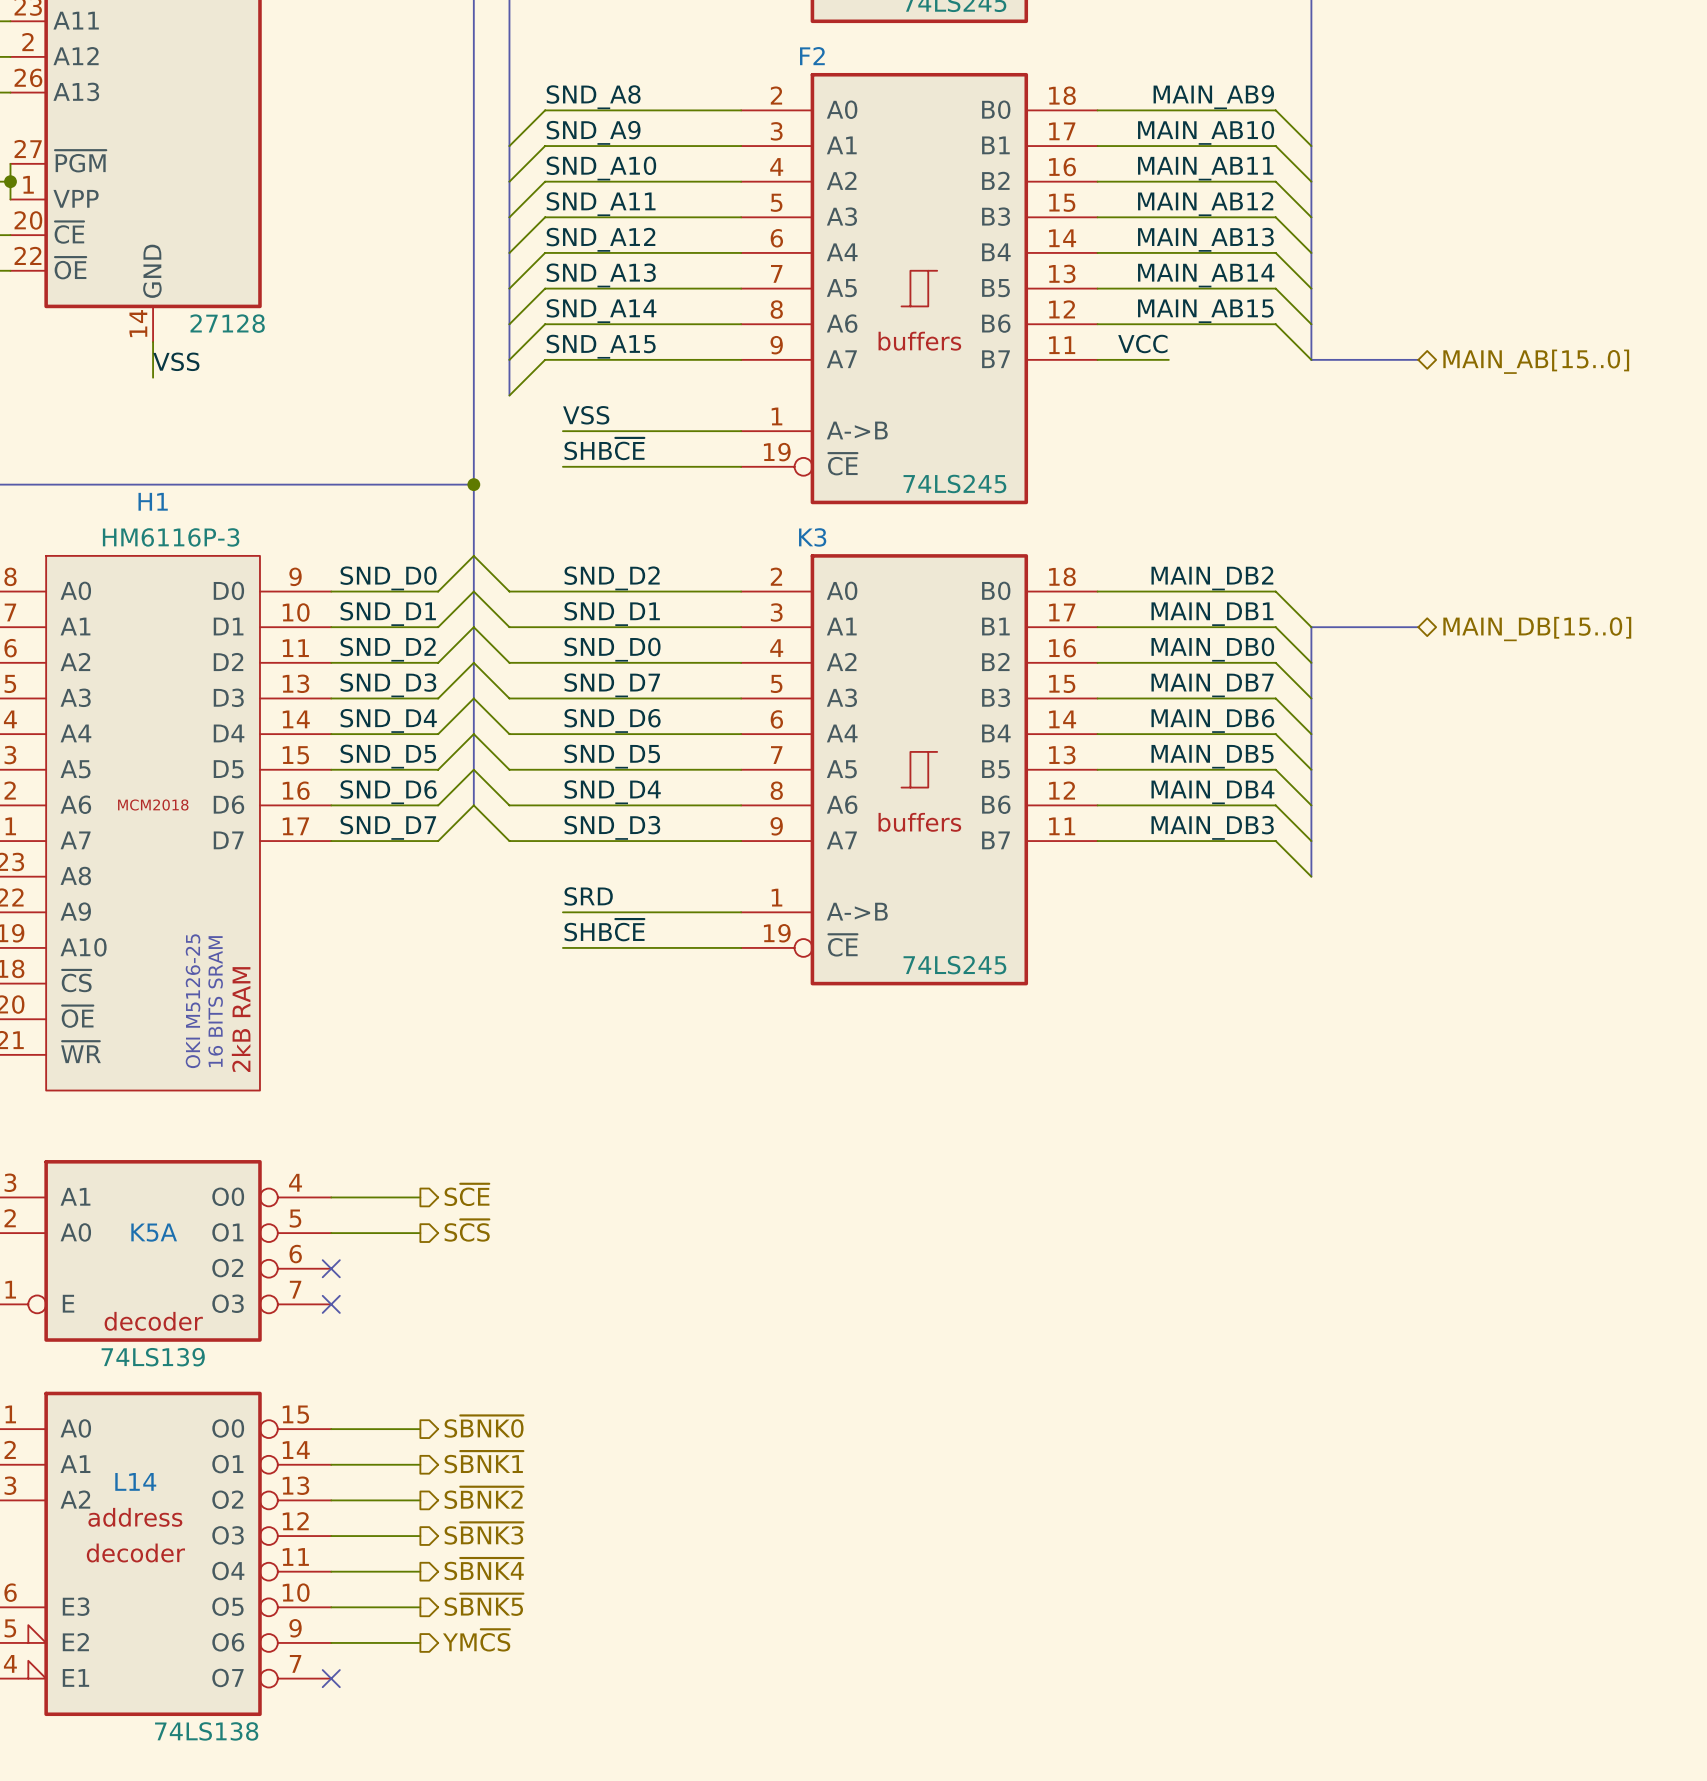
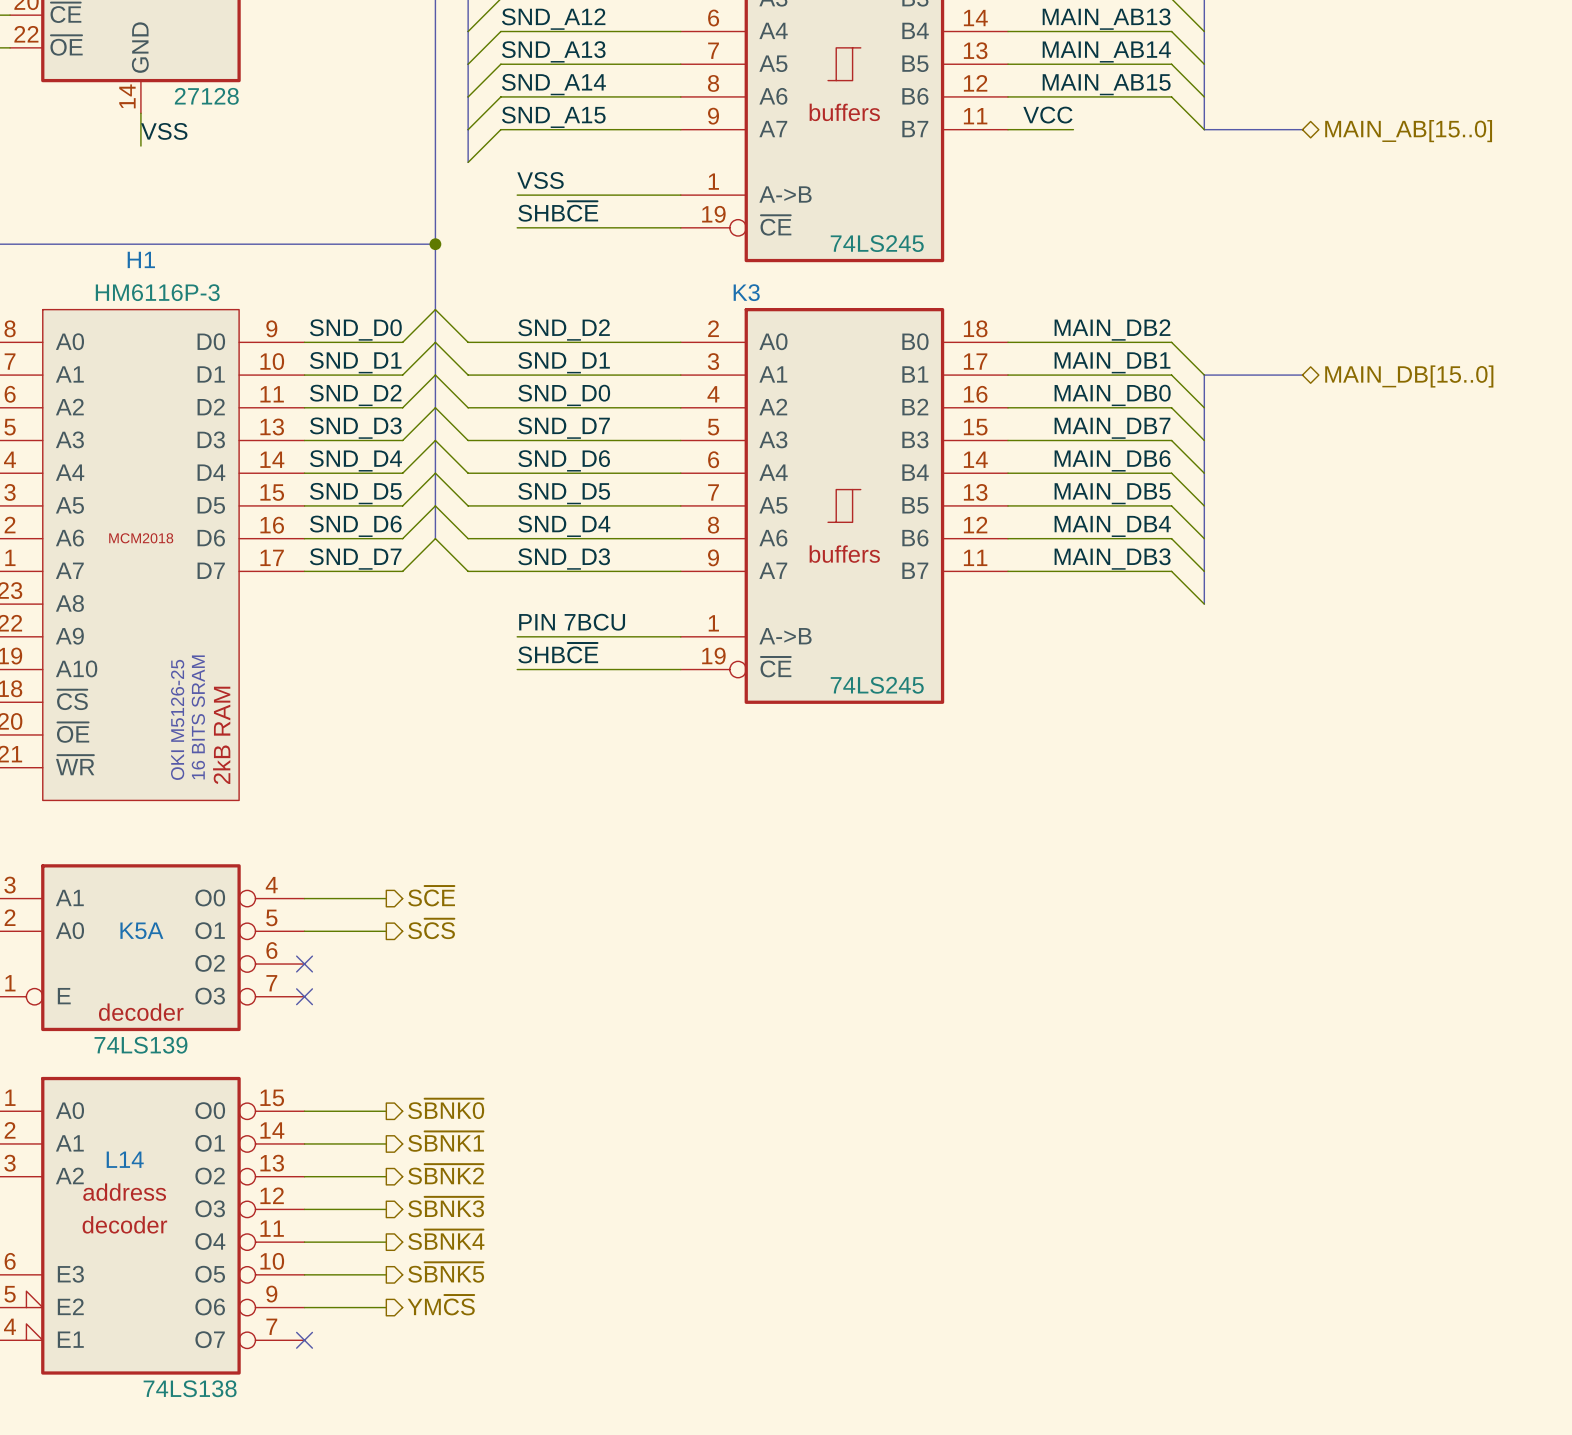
label: SRD (588, 896) -> PIN 7BCU (572, 622)

